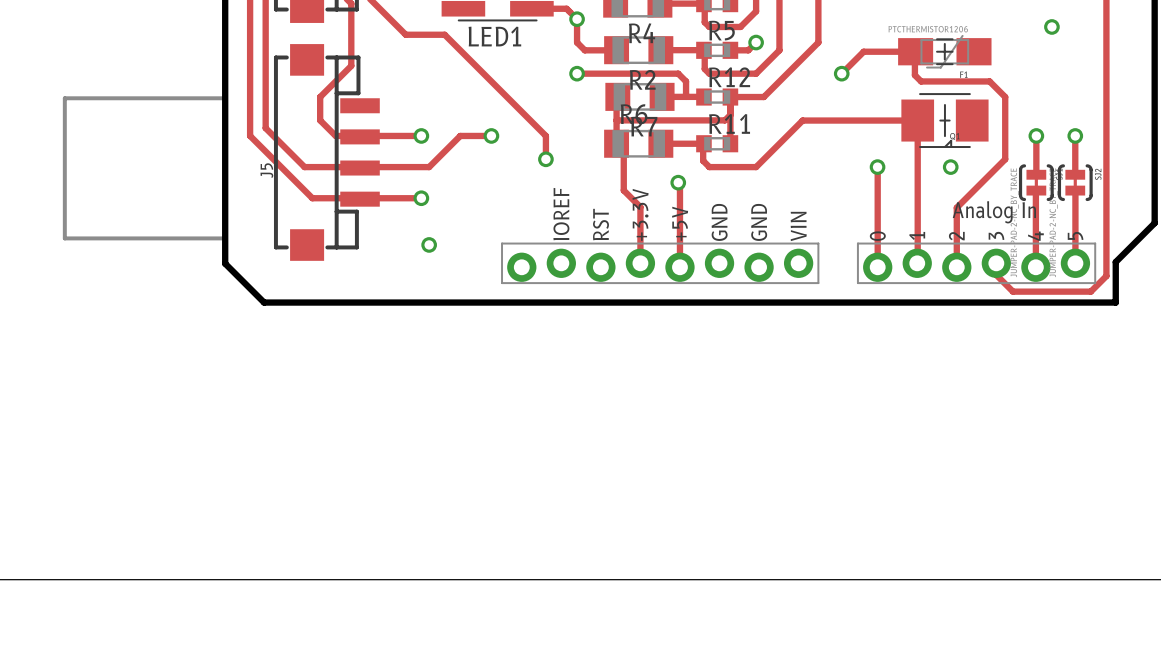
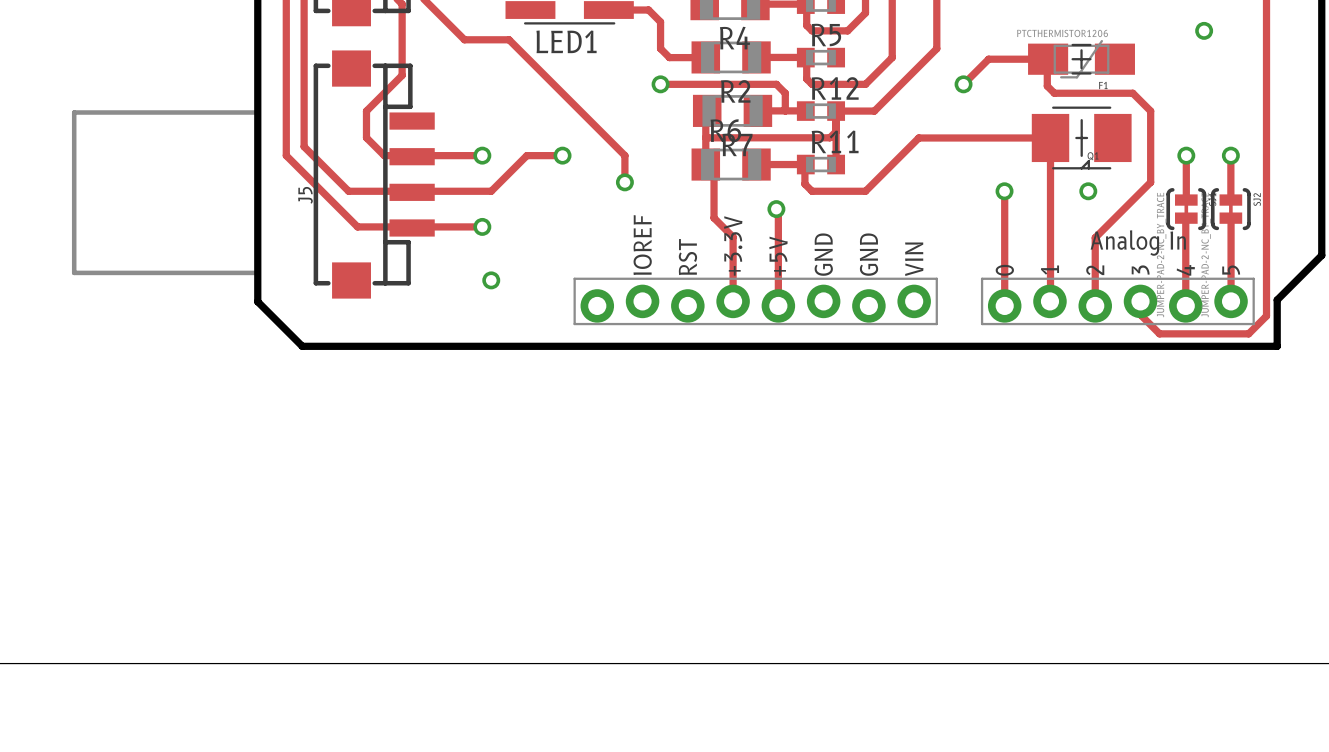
via: (577, 19) -> none
track: (756, 42) (748, 50) (730, 50) -> none
via: (756, 42) -> none

